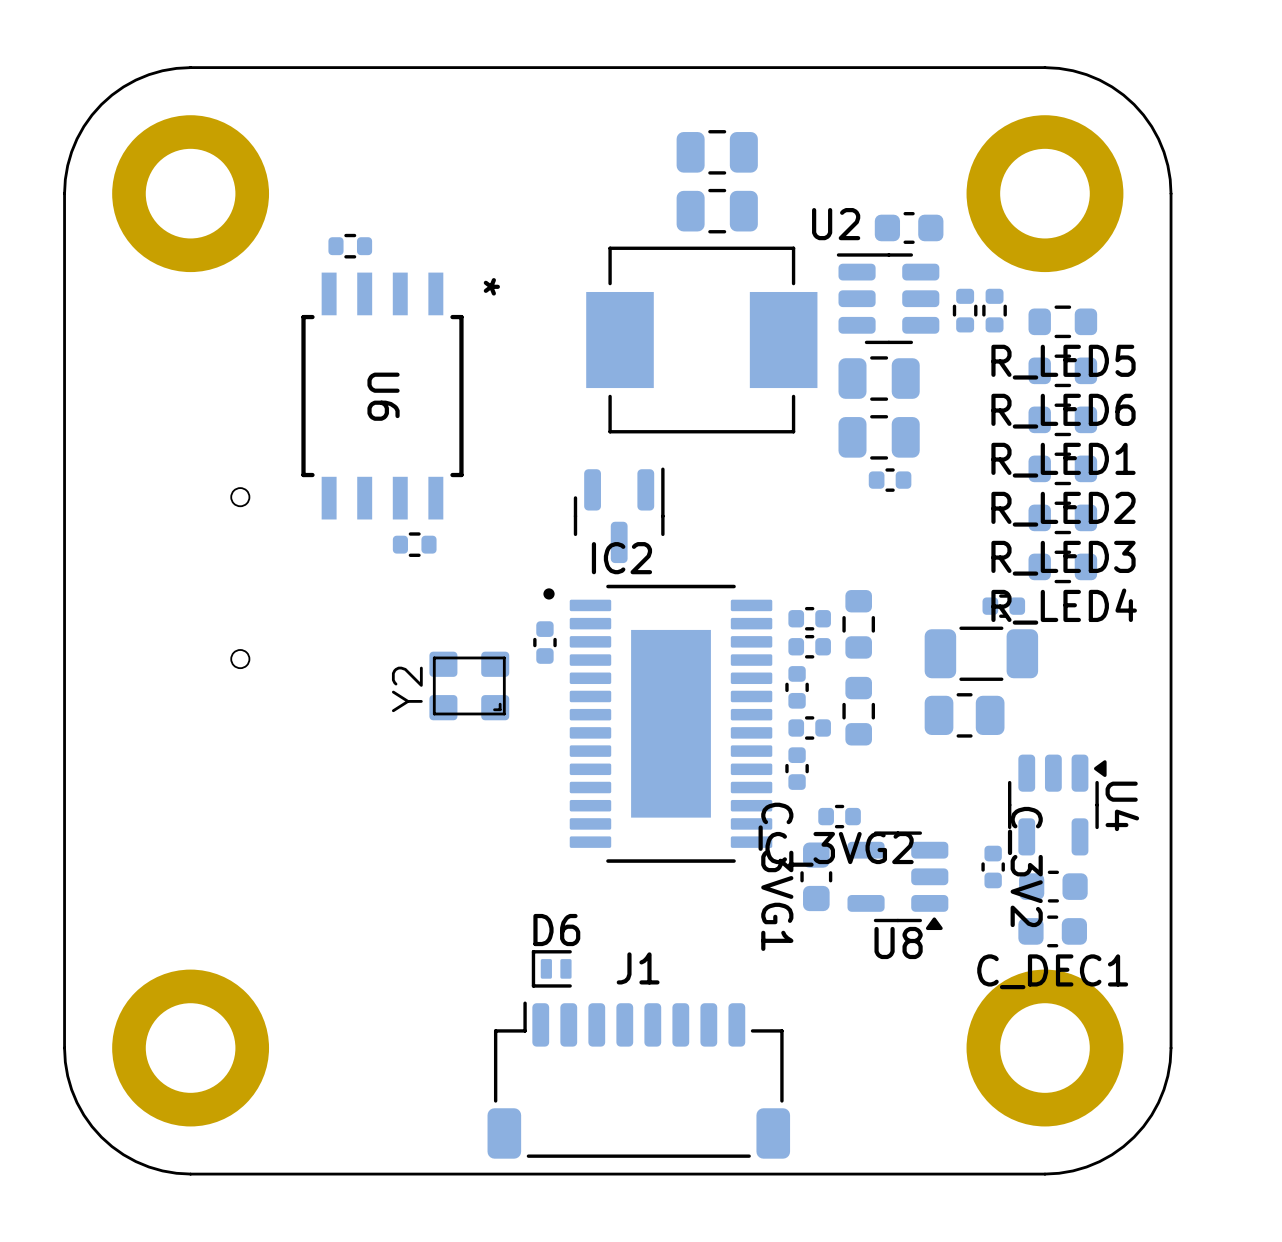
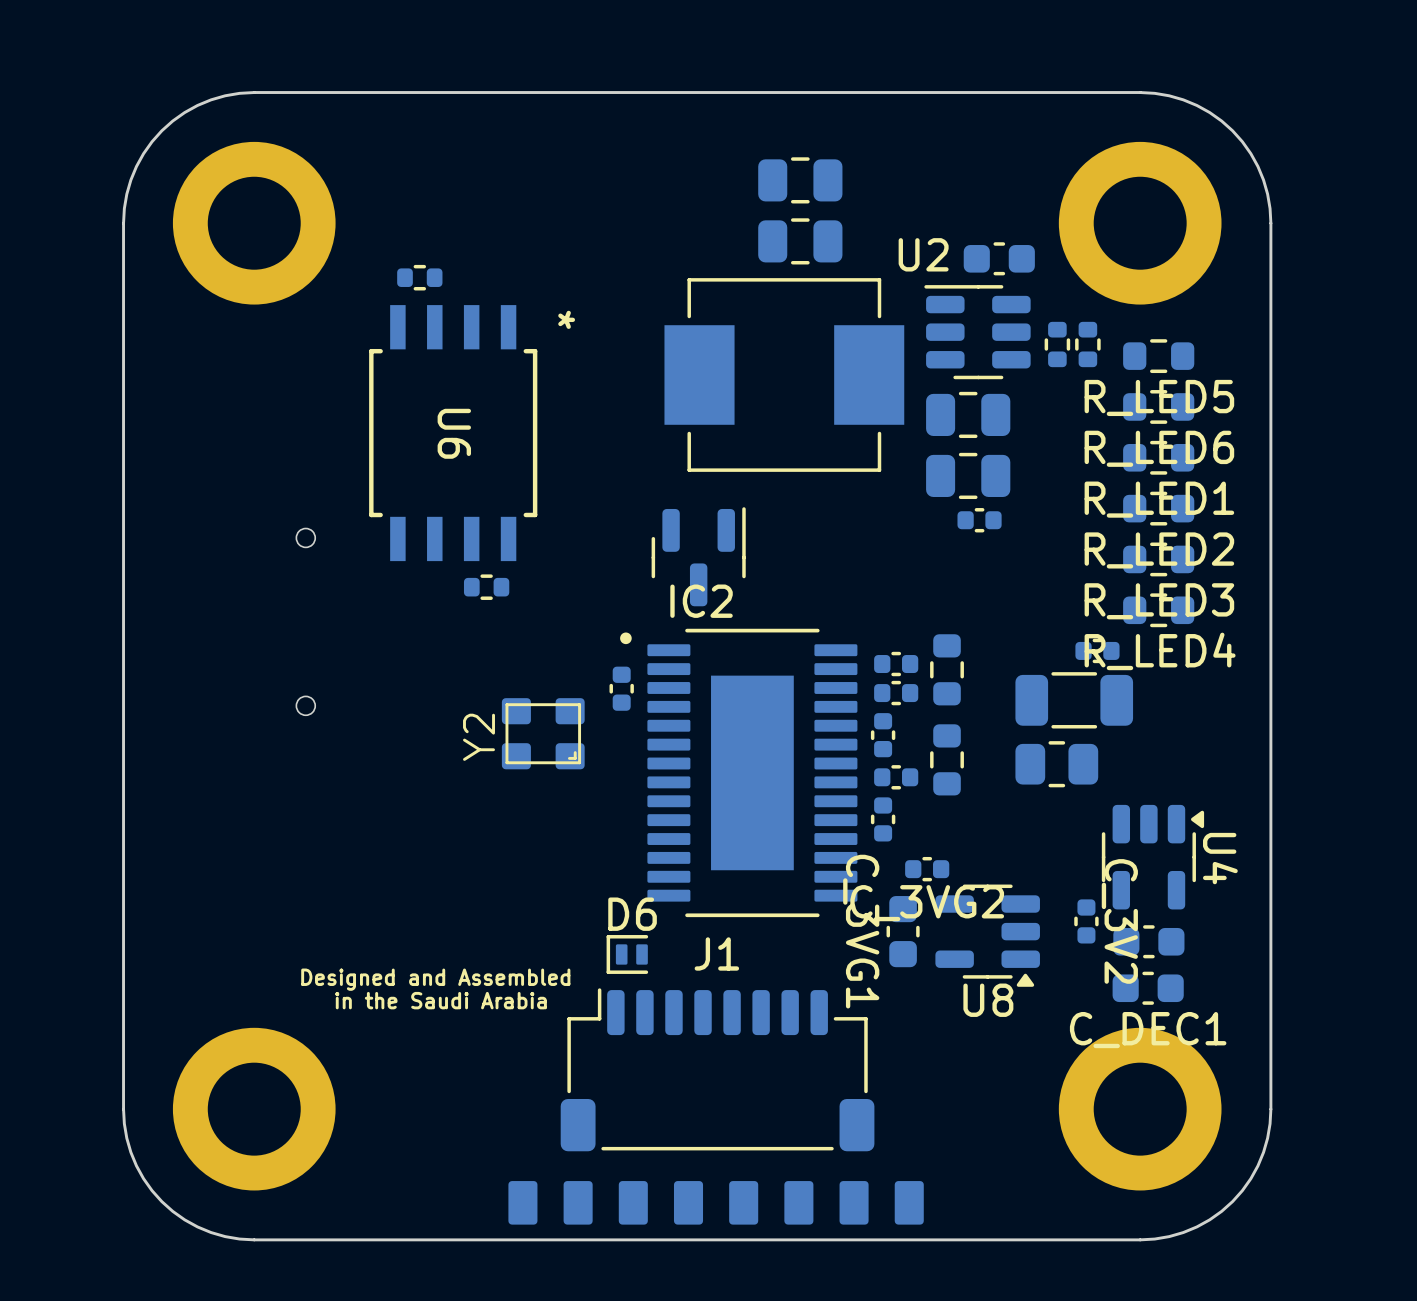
text: none -> Designed and Assembled (435, 979)
text: none -> in the Saudi Arabia (440, 1000)
D6 position: (551, 968) -> (627, 954)
J1 position: (638, 1080) -> (717, 1069)
part: none -> (522, 1202)
part: none -> (578, 1202)
part: none -> (633, 1202)
part: none -> (688, 1202)
part: none -> (743, 1202)
part: none -> (798, 1202)
part: none -> (854, 1202)
part: none -> (909, 1202)

